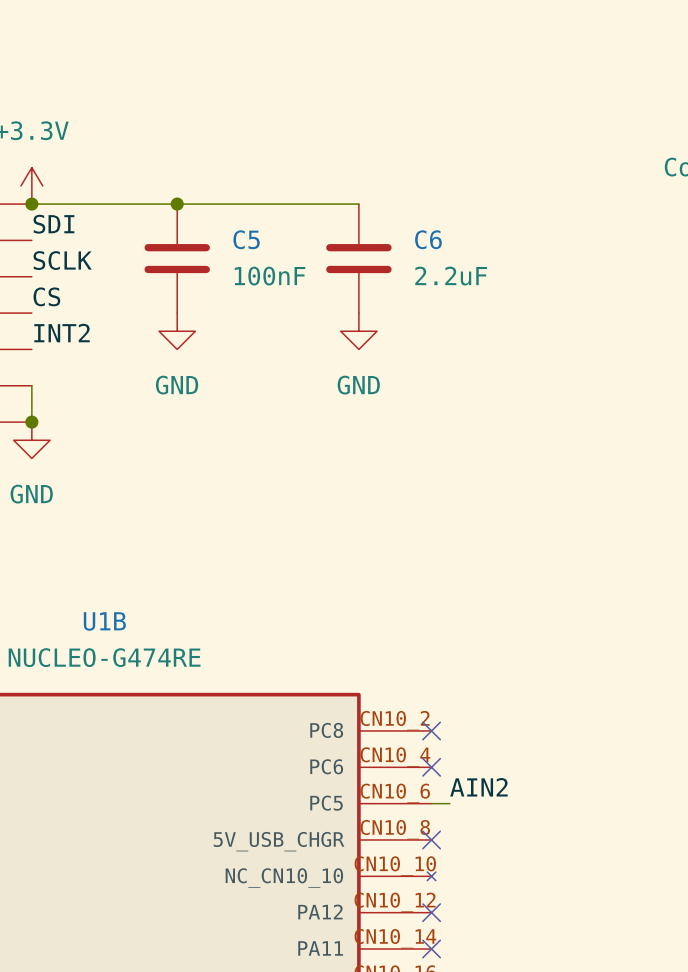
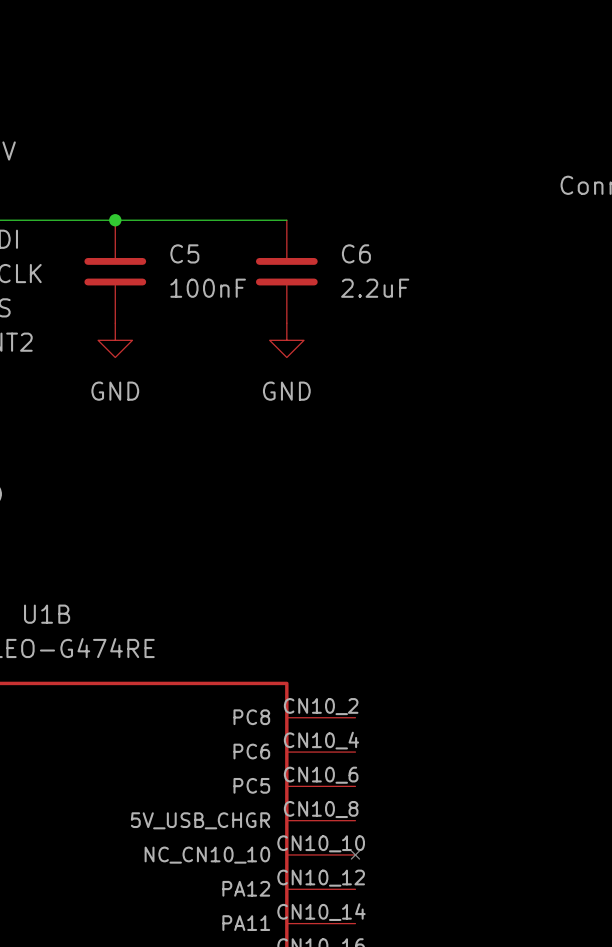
no-connect mark: (431, 730) -> none
no-connect mark: (431, 767) -> none
label: AIN2 (478, 787) -> none
wire: (431, 803) (449, 803) -> none
no-connect mark: (431, 839) -> none
no-connect mark: (431, 912) -> none
no-connect mark: (431, 949) -> none

